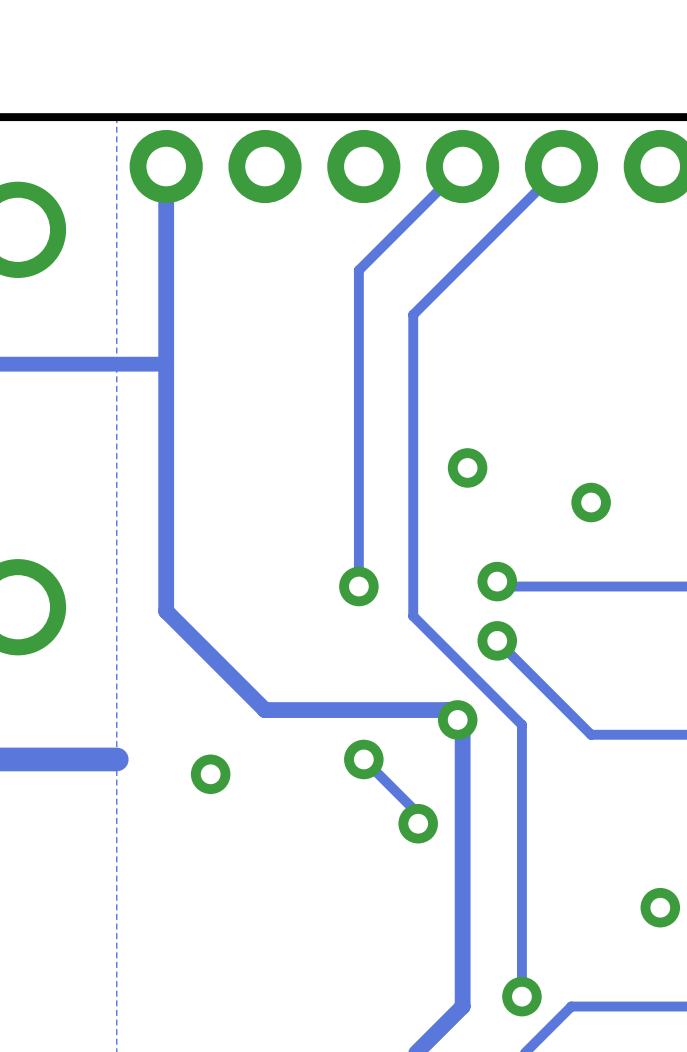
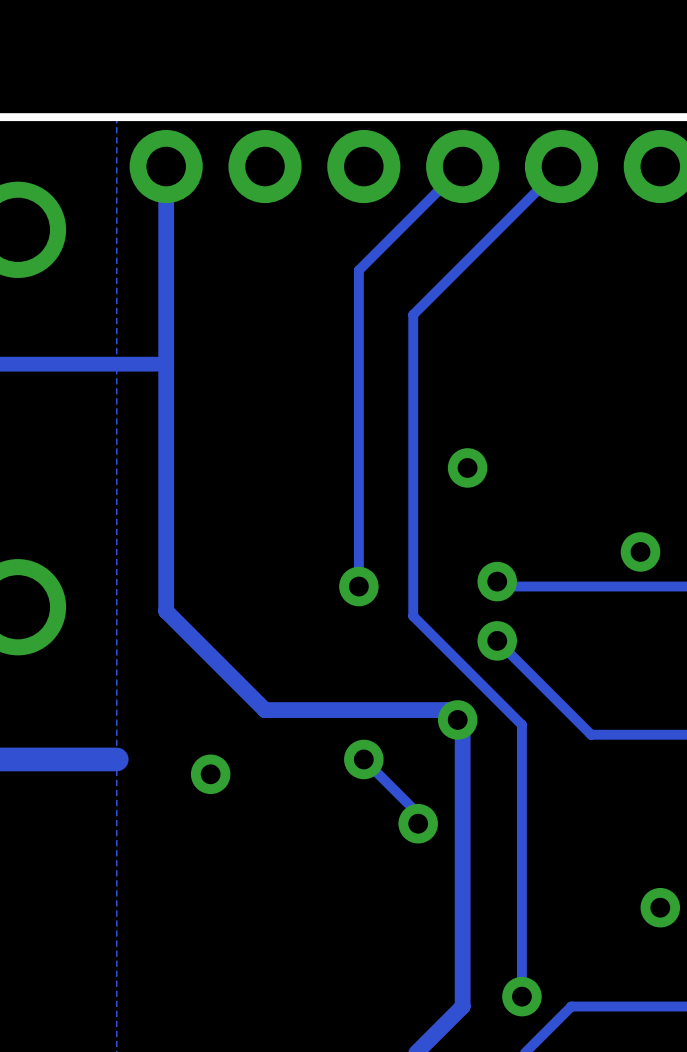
via: (591, 502) -> none
via: none -> (640, 551)

